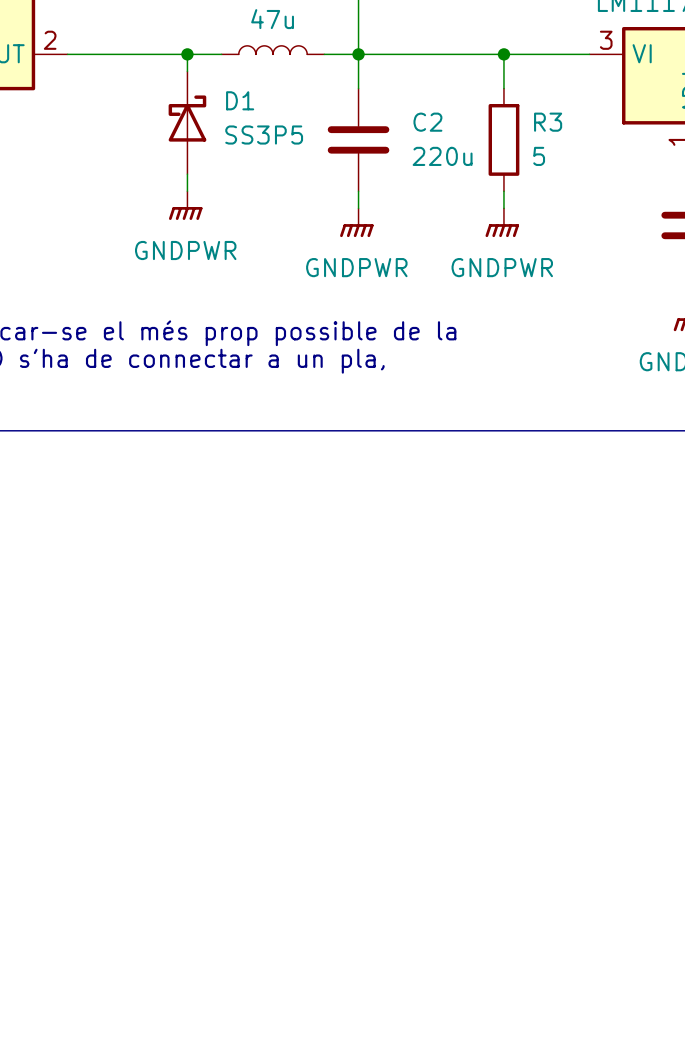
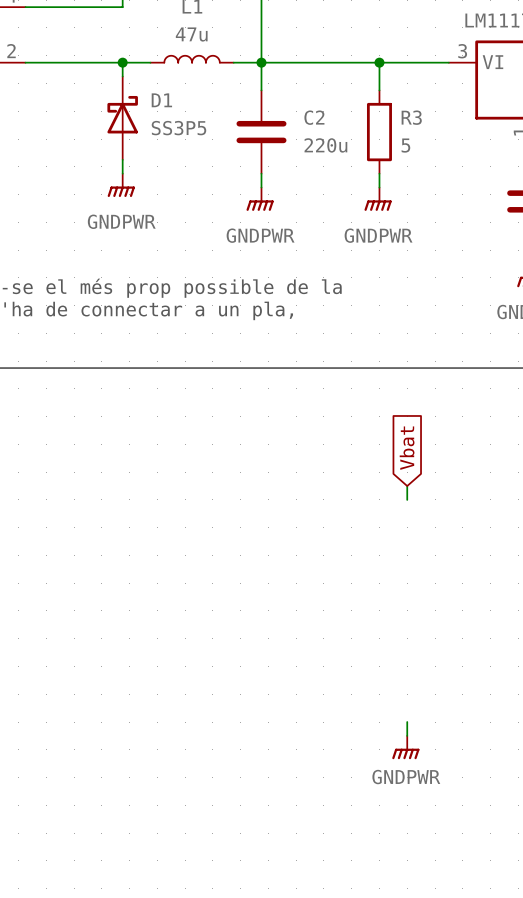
global label: none -> Vbat (407, 448)
wire: none -> (407, 486) (407, 499)
wire: none -> (407, 722) (407, 735)
power symbol: none -> GNDPWR (405, 747)

